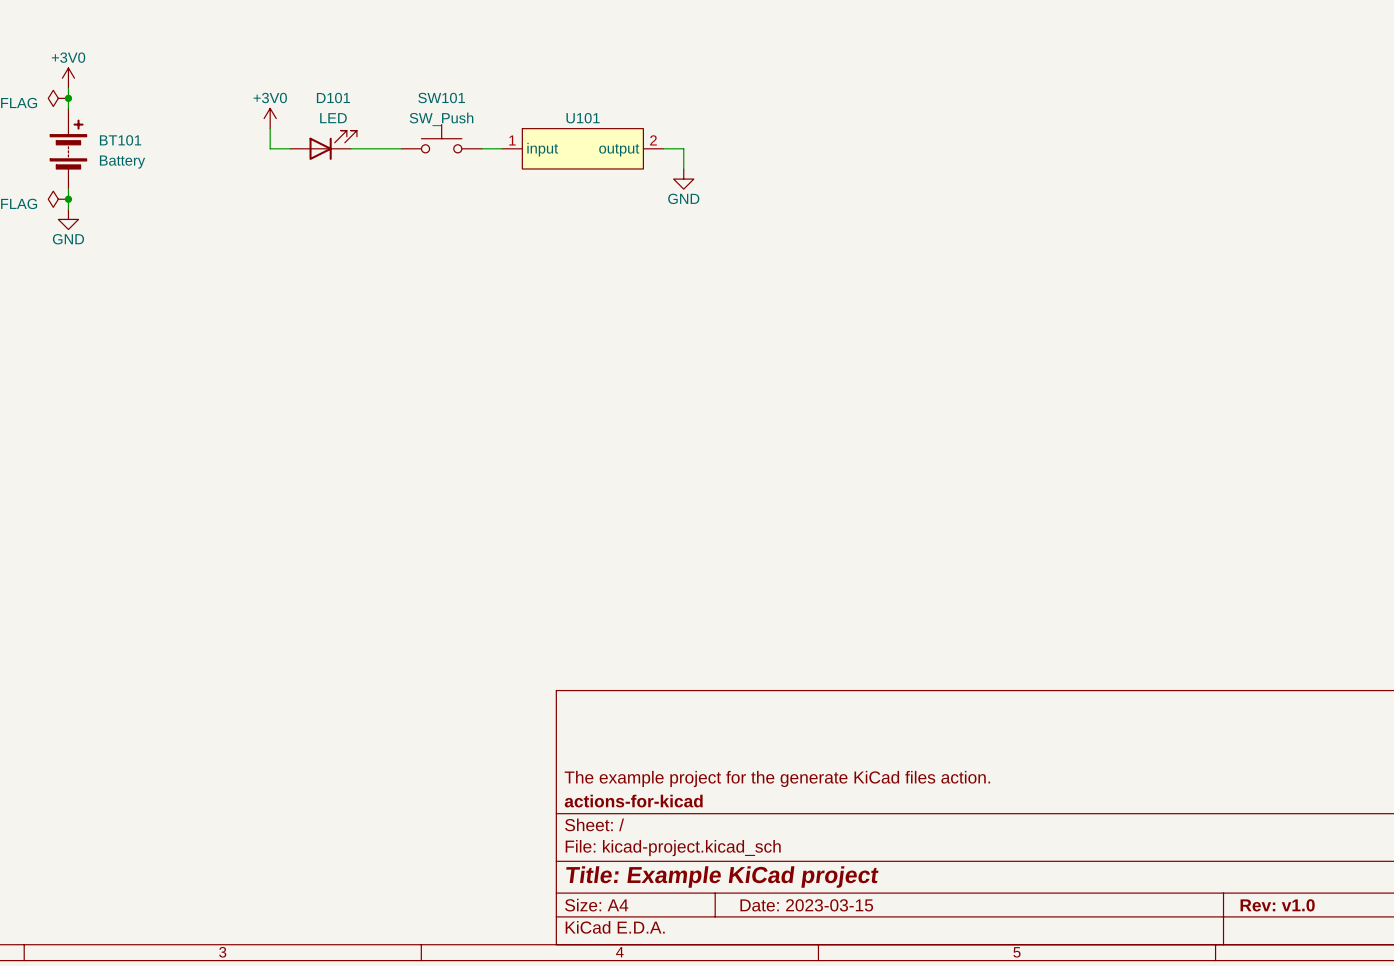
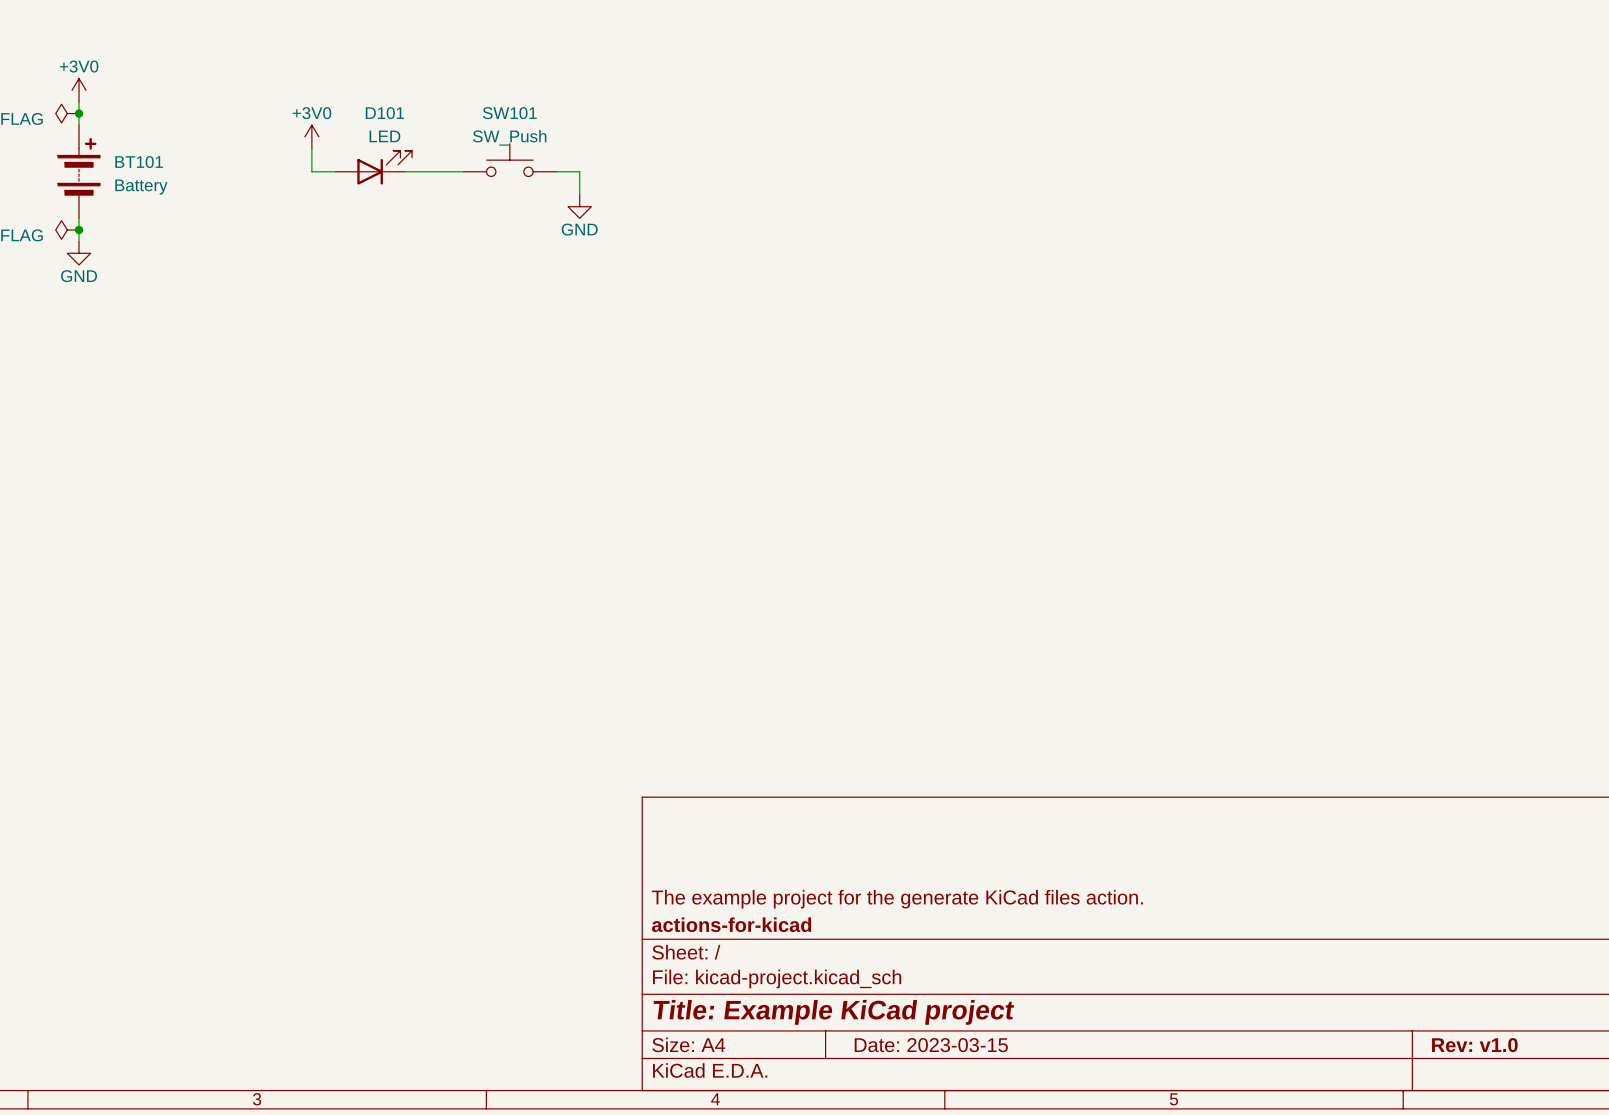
wire: none -> (579, 171) (579, 195)
U101: (582, 148) -> none
wire: (663, 148) (683, 148) (683, 168) -> none
power symbol position: GND (683, 179) -> GND (579, 206)

